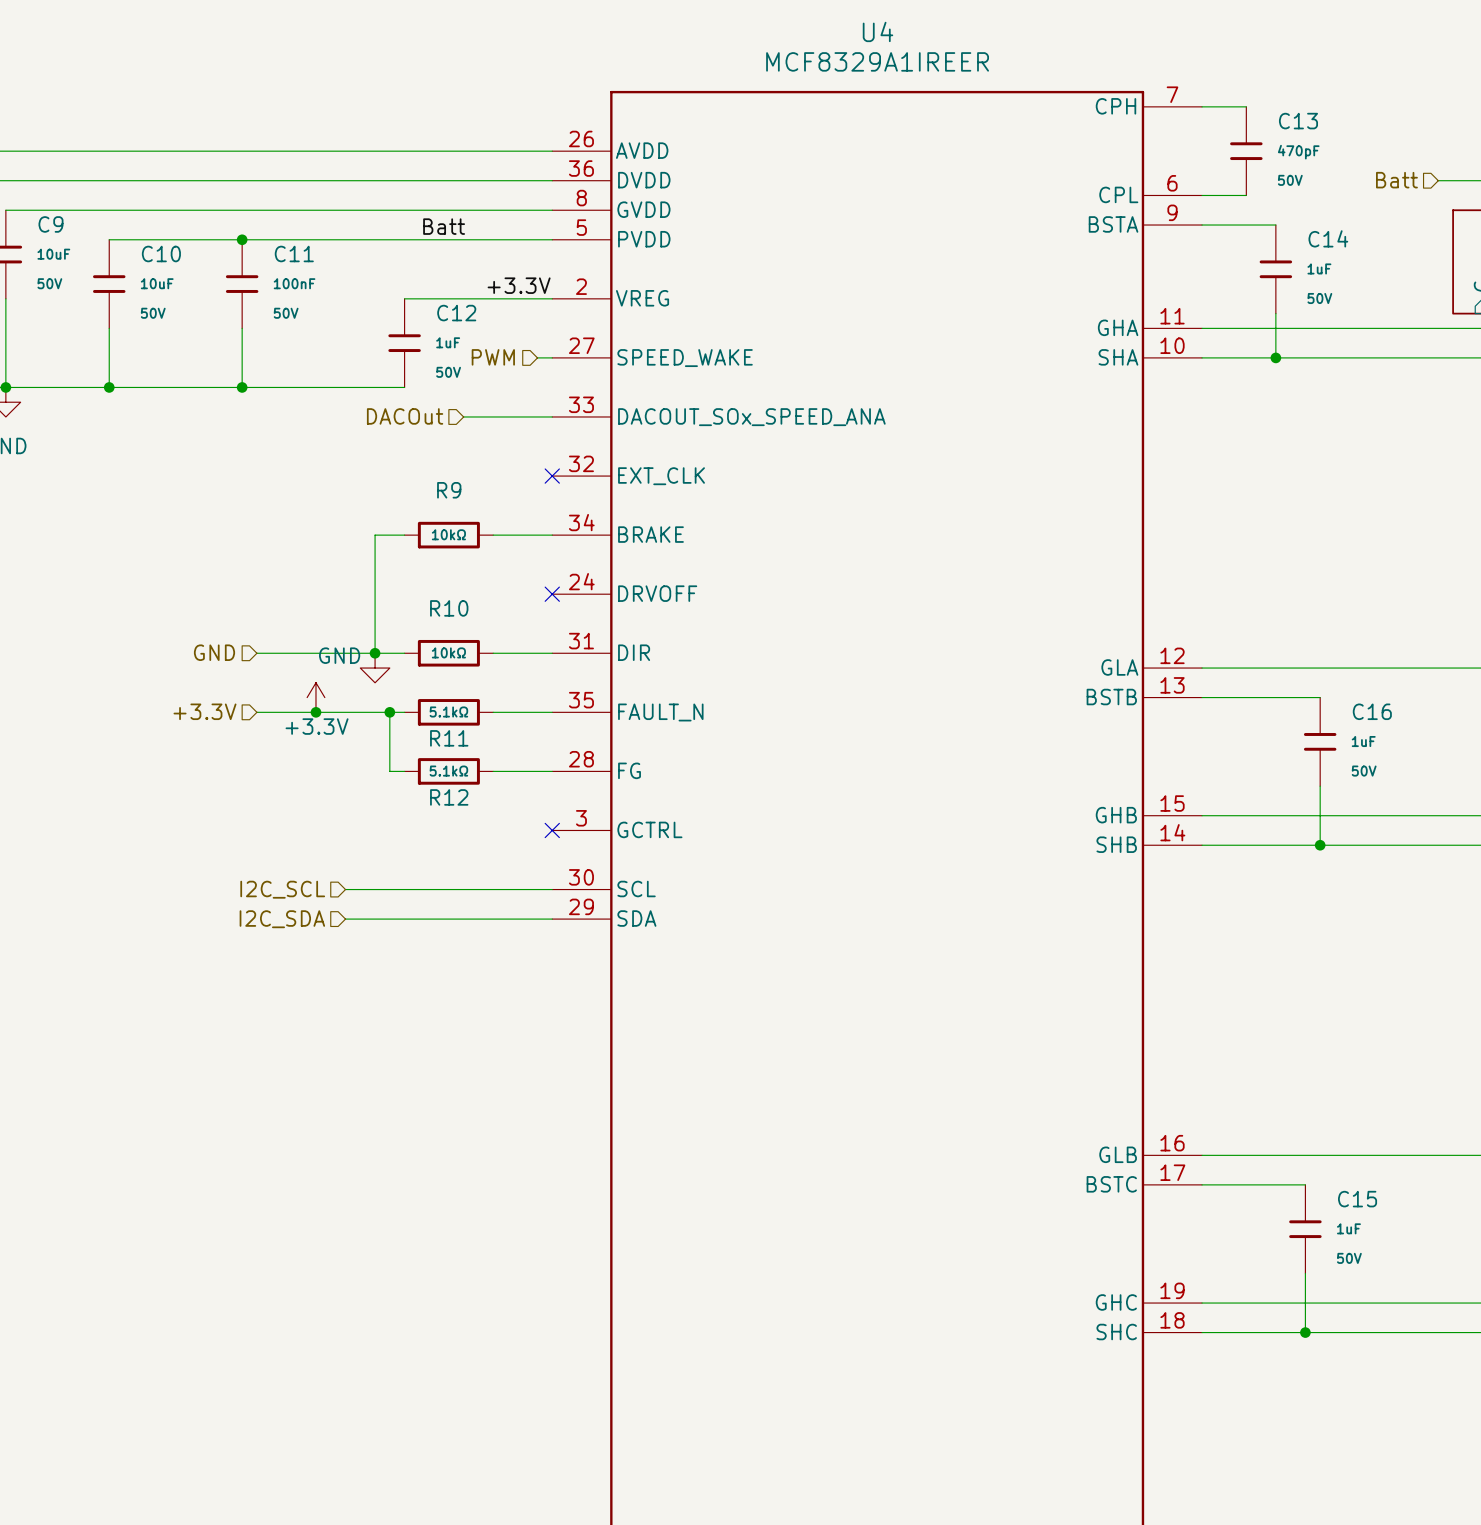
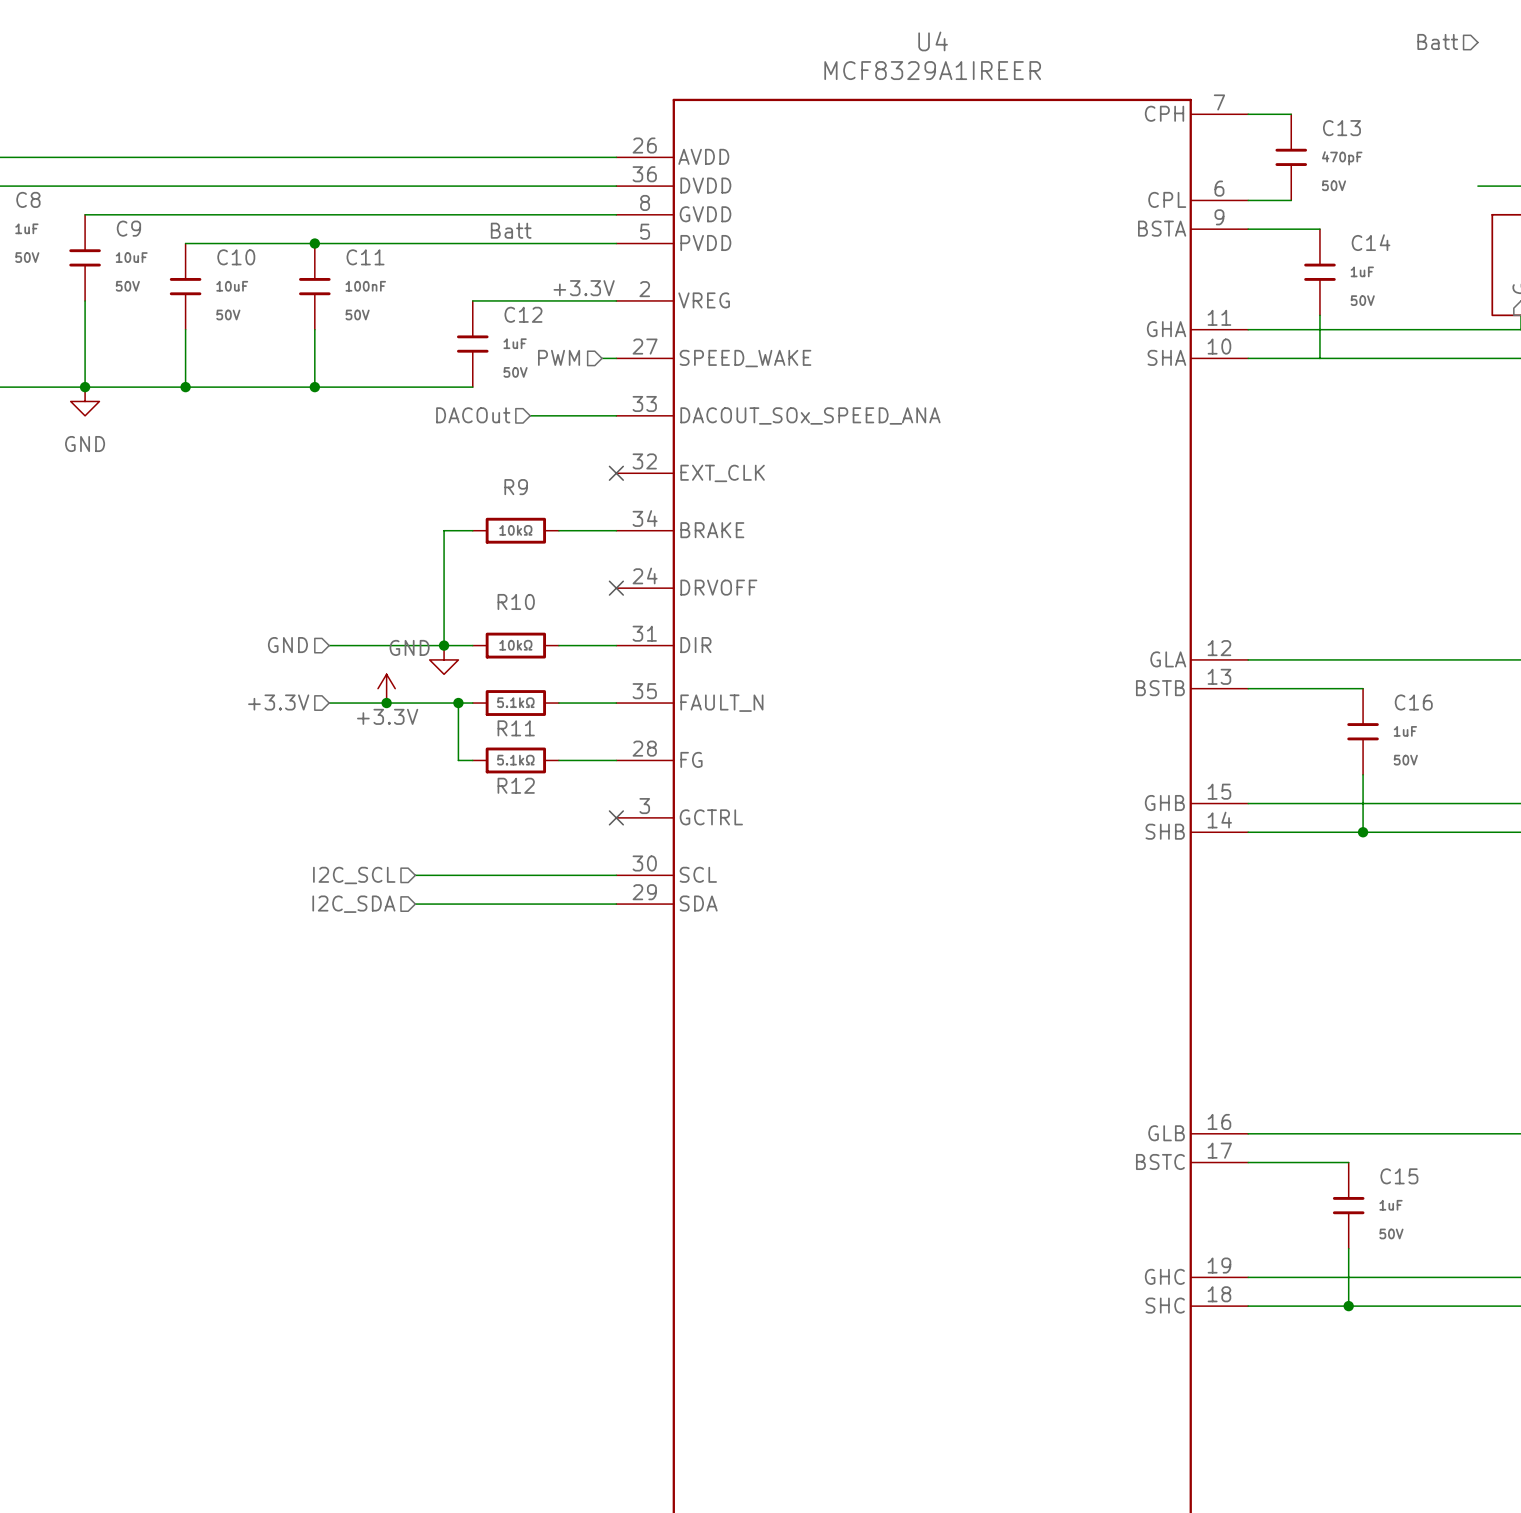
hierarchical label position: Batt (1396, 180) -> Batt (1437, 41)
junction: (1275, 357) -> none

